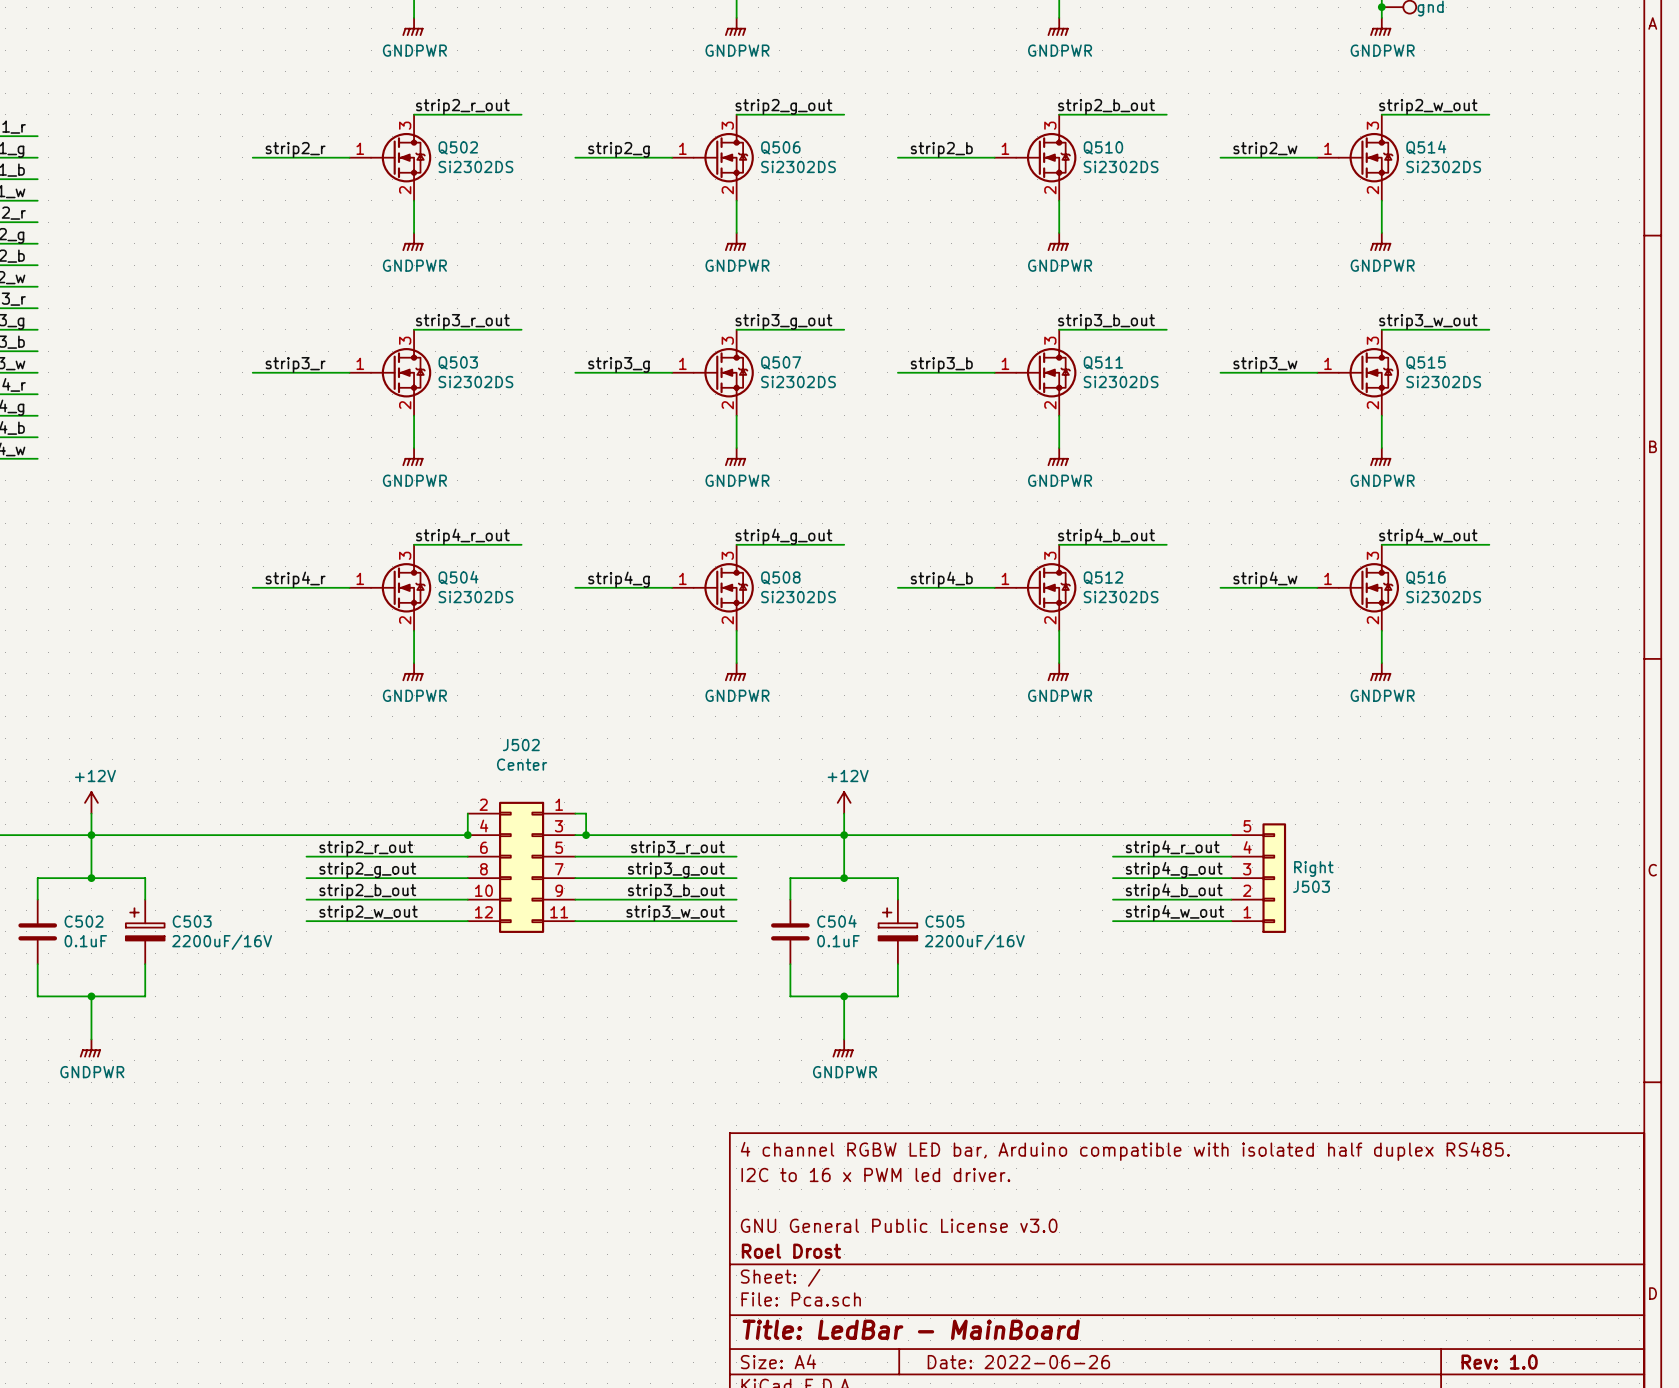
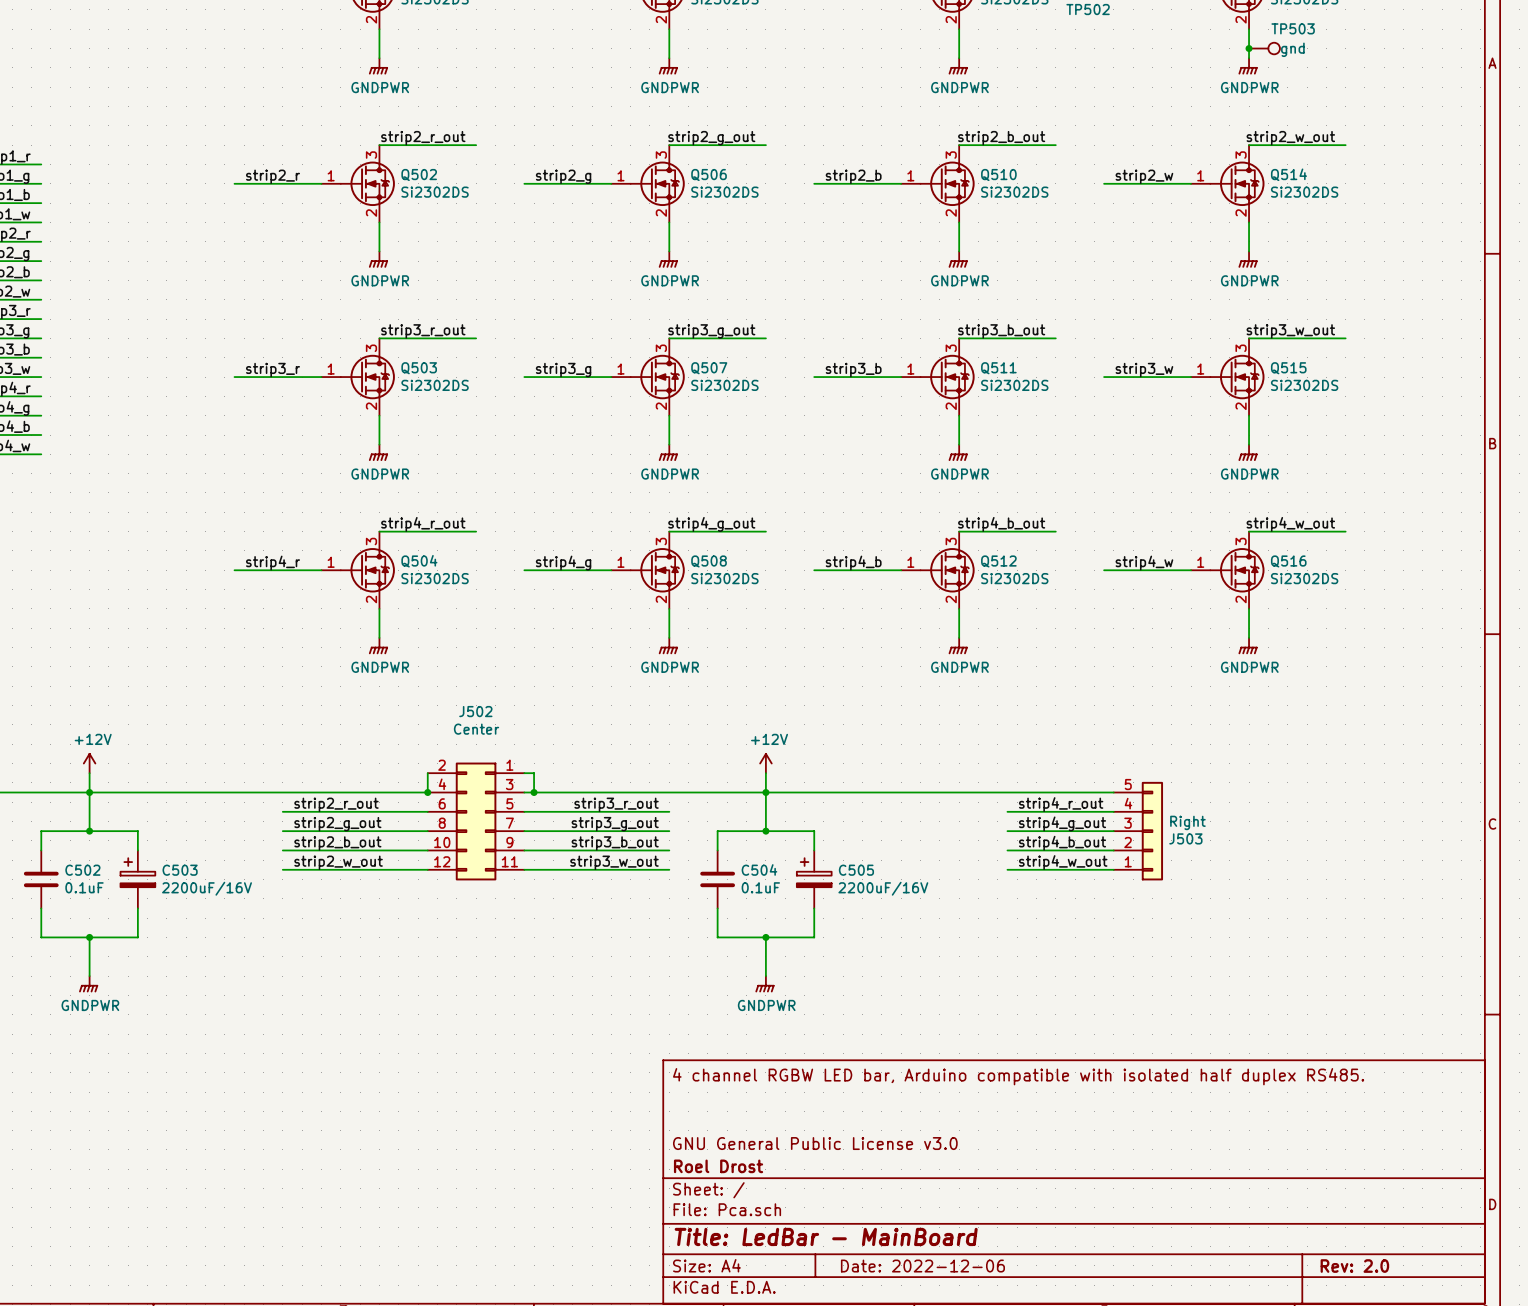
title block: I2C to 16 x PWM led driver. (875, 1174) -> none
title block: Date: 2022-06-26 (1018, 1362) -> Date: 2022-12-06 (922, 1266)
title block: Rev: 1.0 (1499, 1362) -> Rev: 2.0 (1354, 1266)

